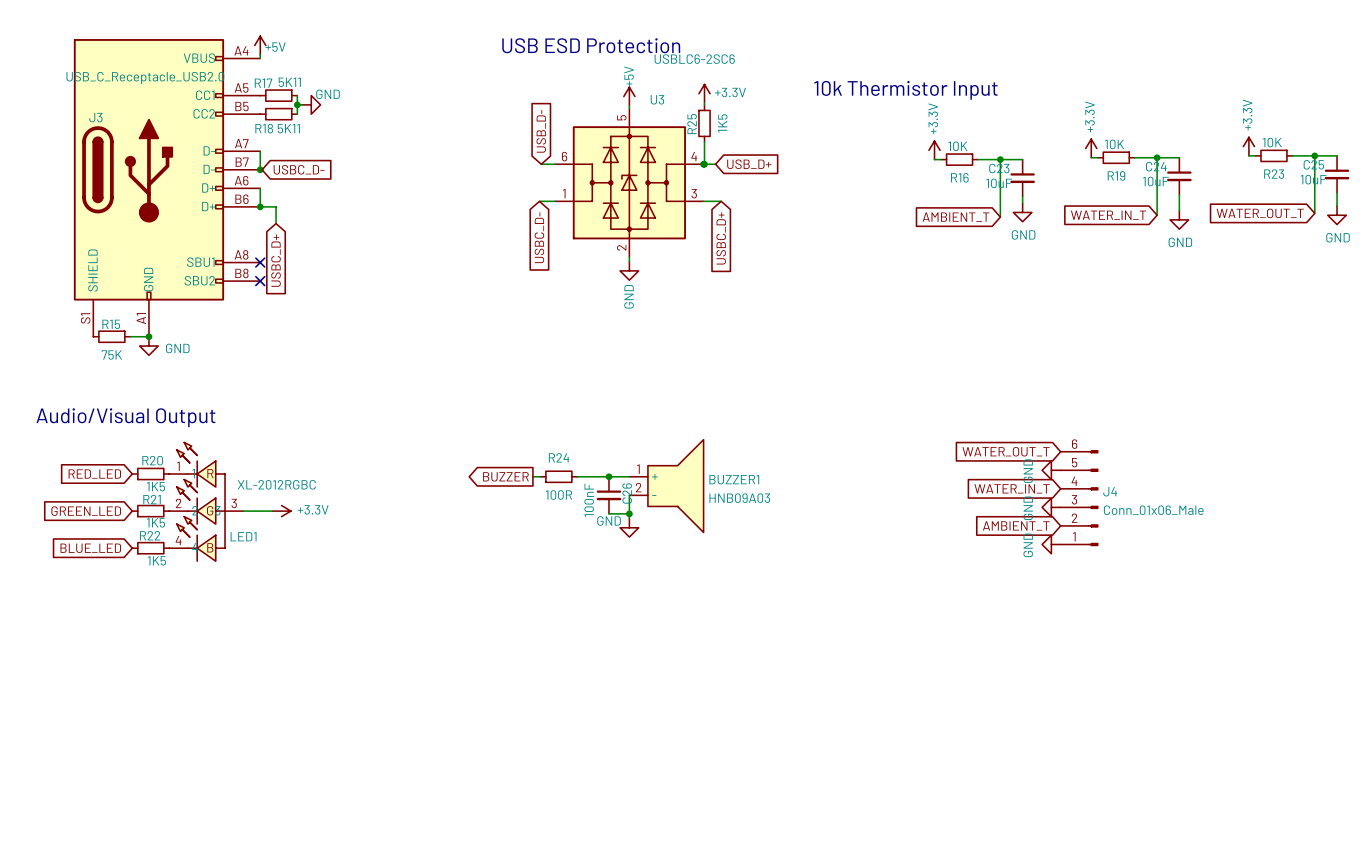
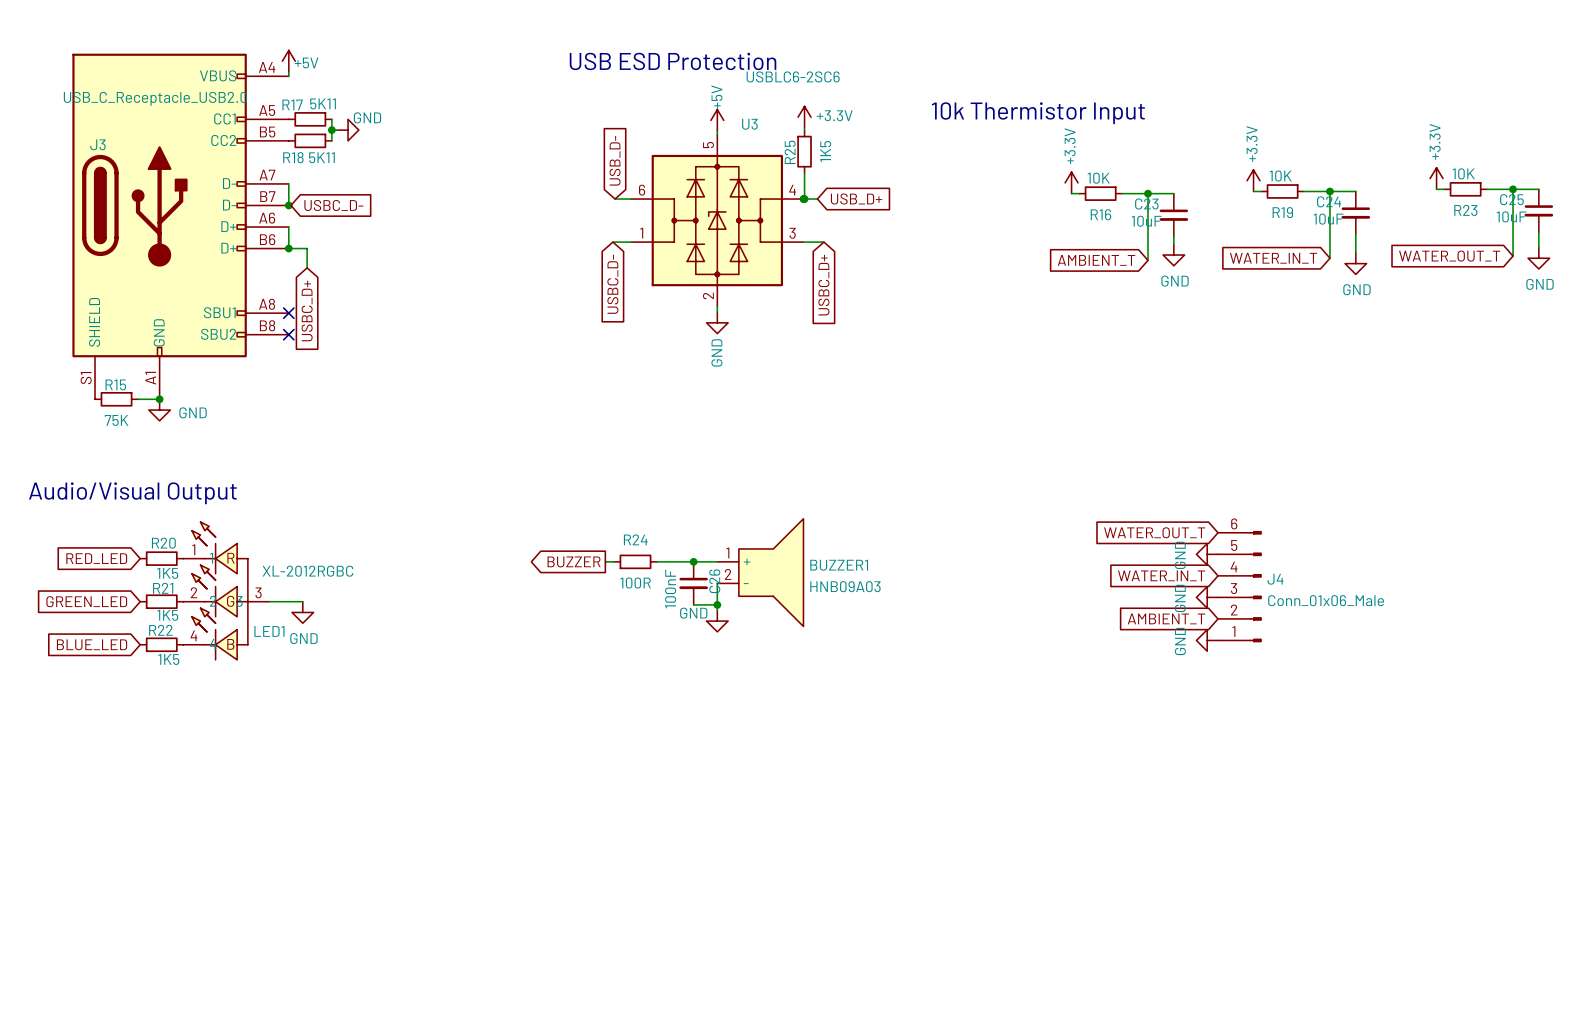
power symbol: +3.3V (281, 511) -> none
power symbol: none -> GND (302, 612)

